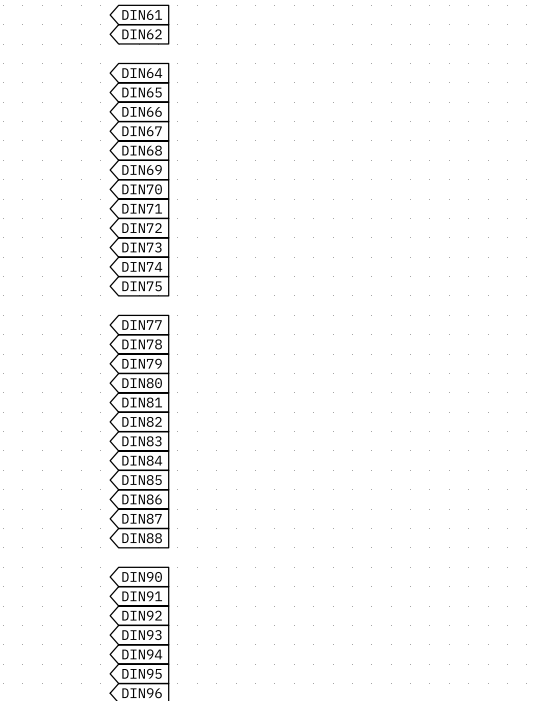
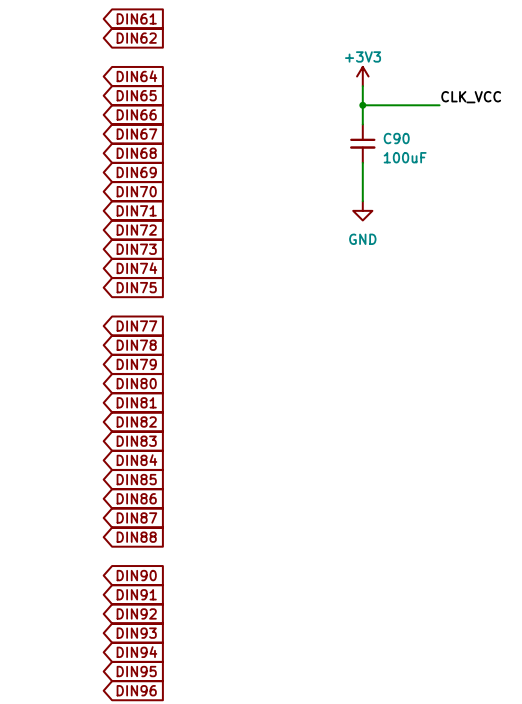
power symbol: none -> +3V3 (362, 76)
wire: none -> (362, 86) (362, 124)
label: none -> CLK_VCC (471, 97)
wire: none -> (362, 105) (439, 105)
junction: none -> (362, 105)
C90: none -> 100uF (362, 143)
wire: none -> (362, 162) (362, 201)
power symbol: none -> GND (362, 210)

